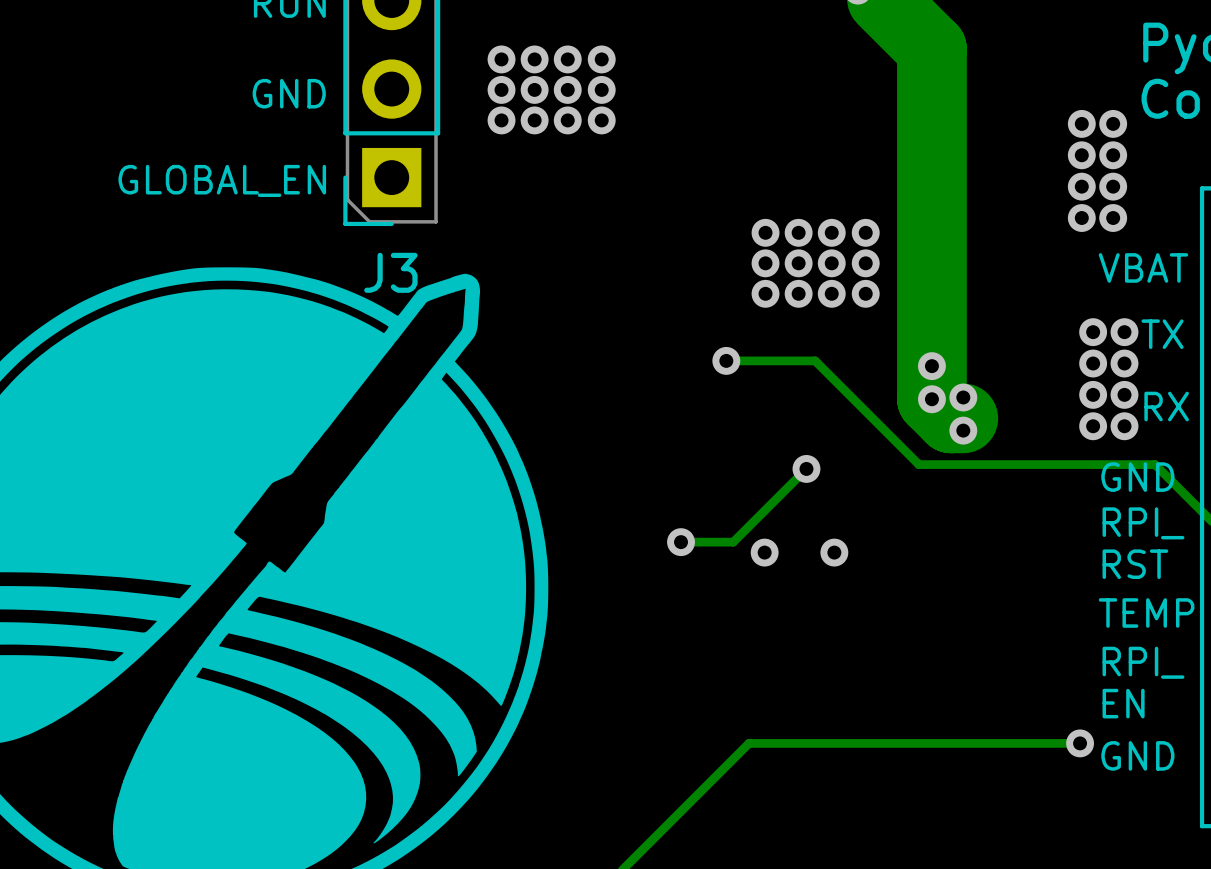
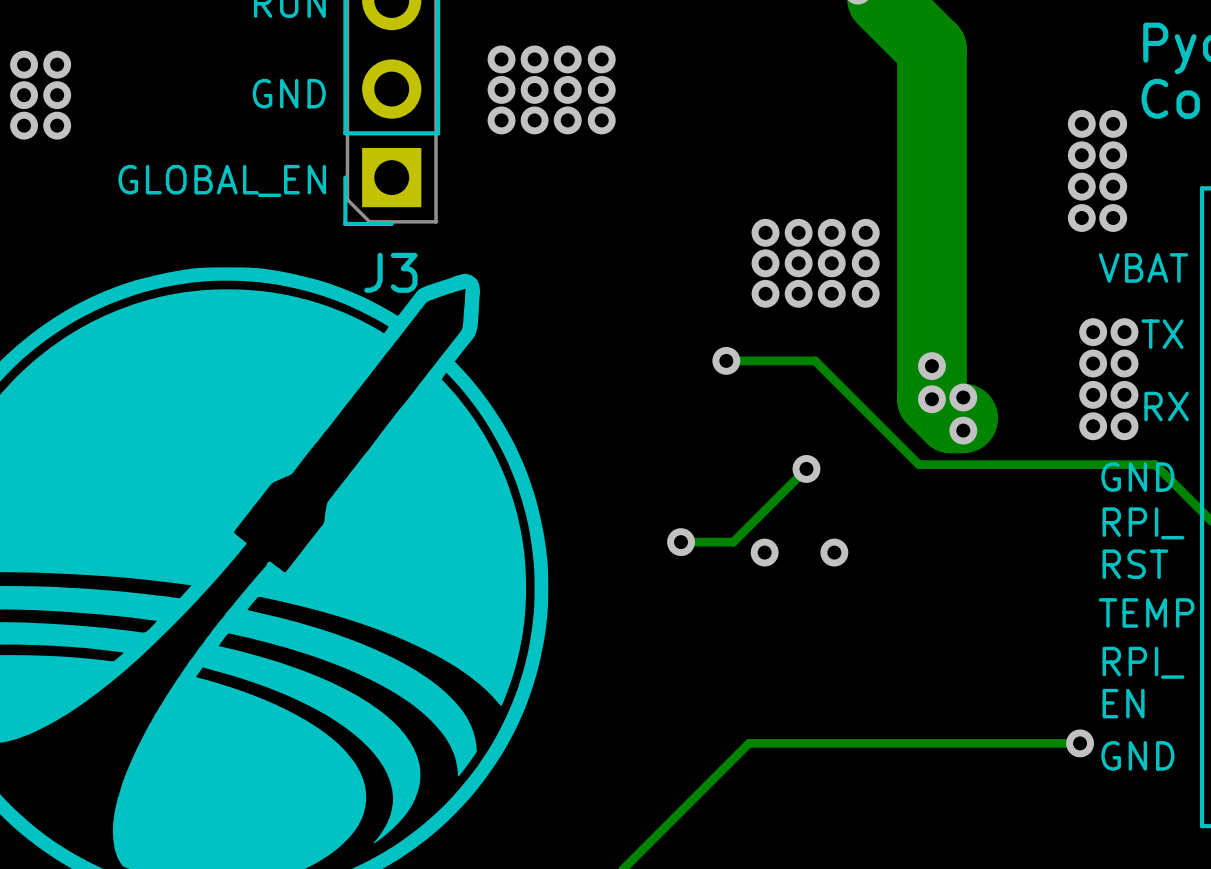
via: none -> (24, 64)
via: none -> (57, 64)
via: none -> (24, 95)
via: none -> (57, 95)
via: none -> (24, 125)
via: none -> (57, 125)

